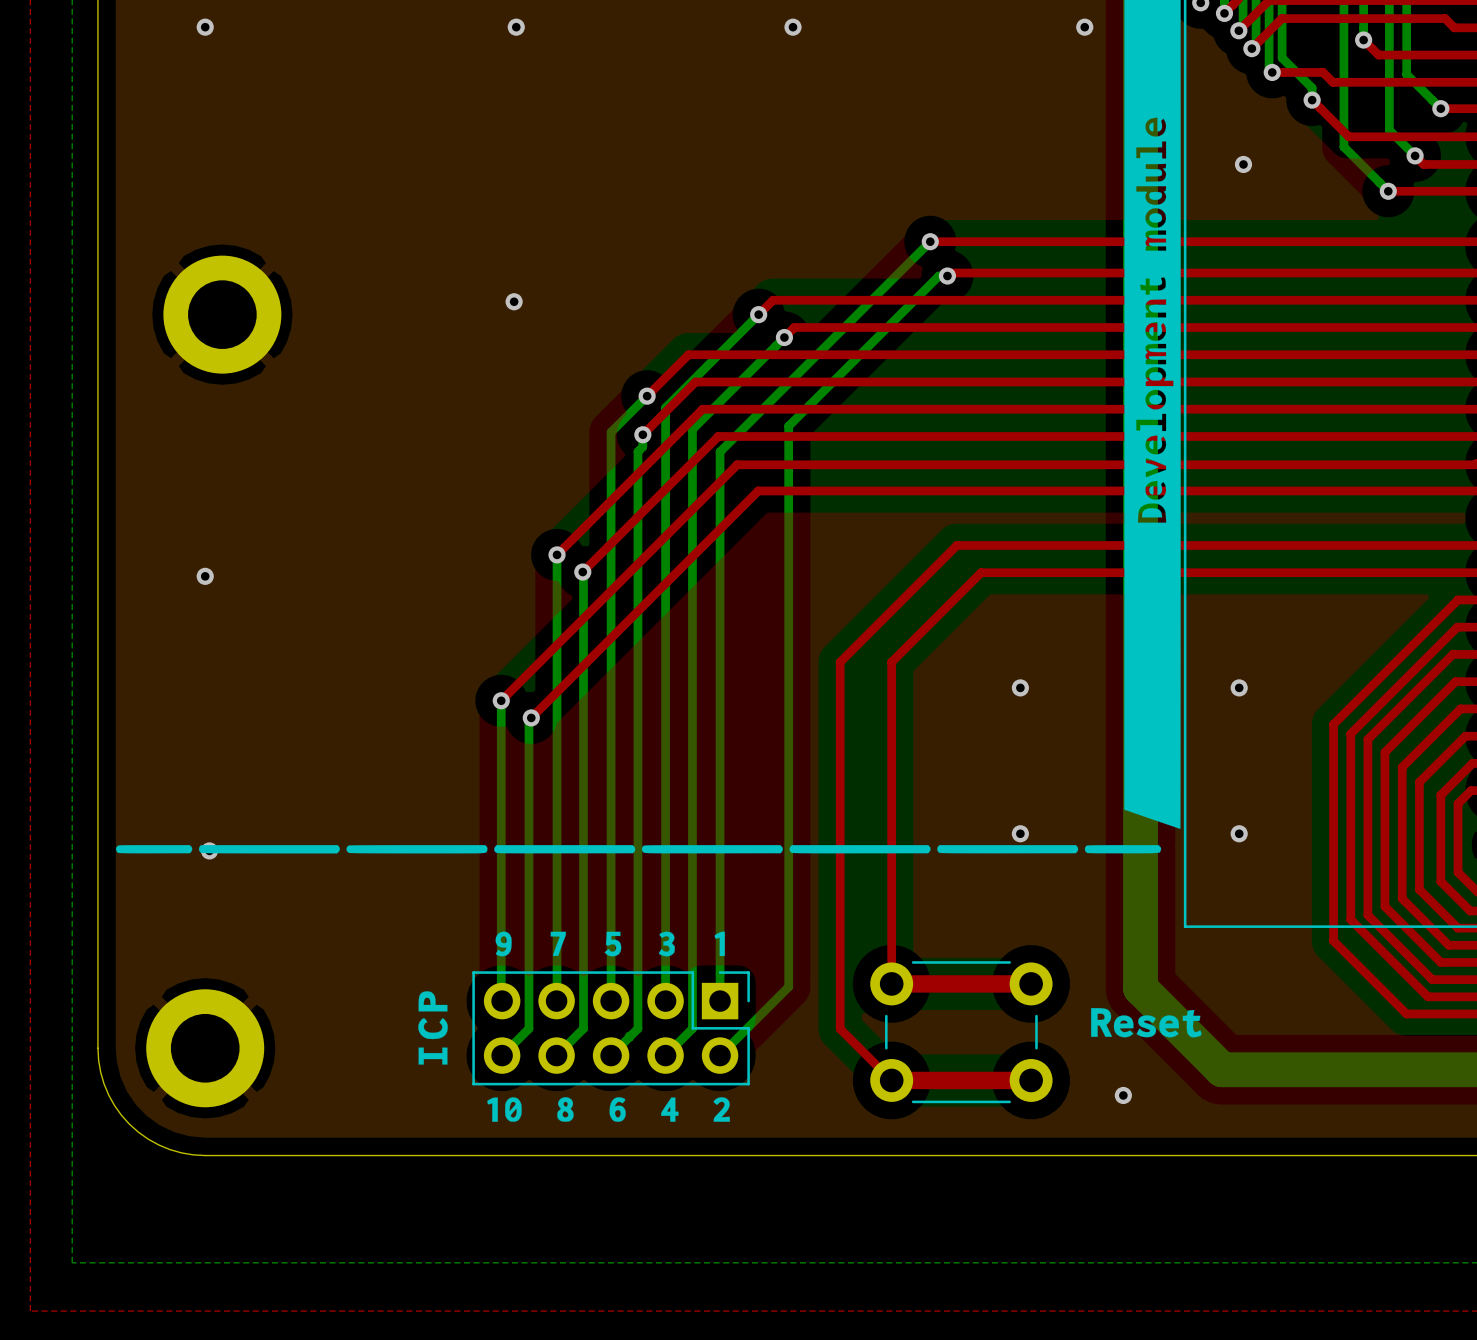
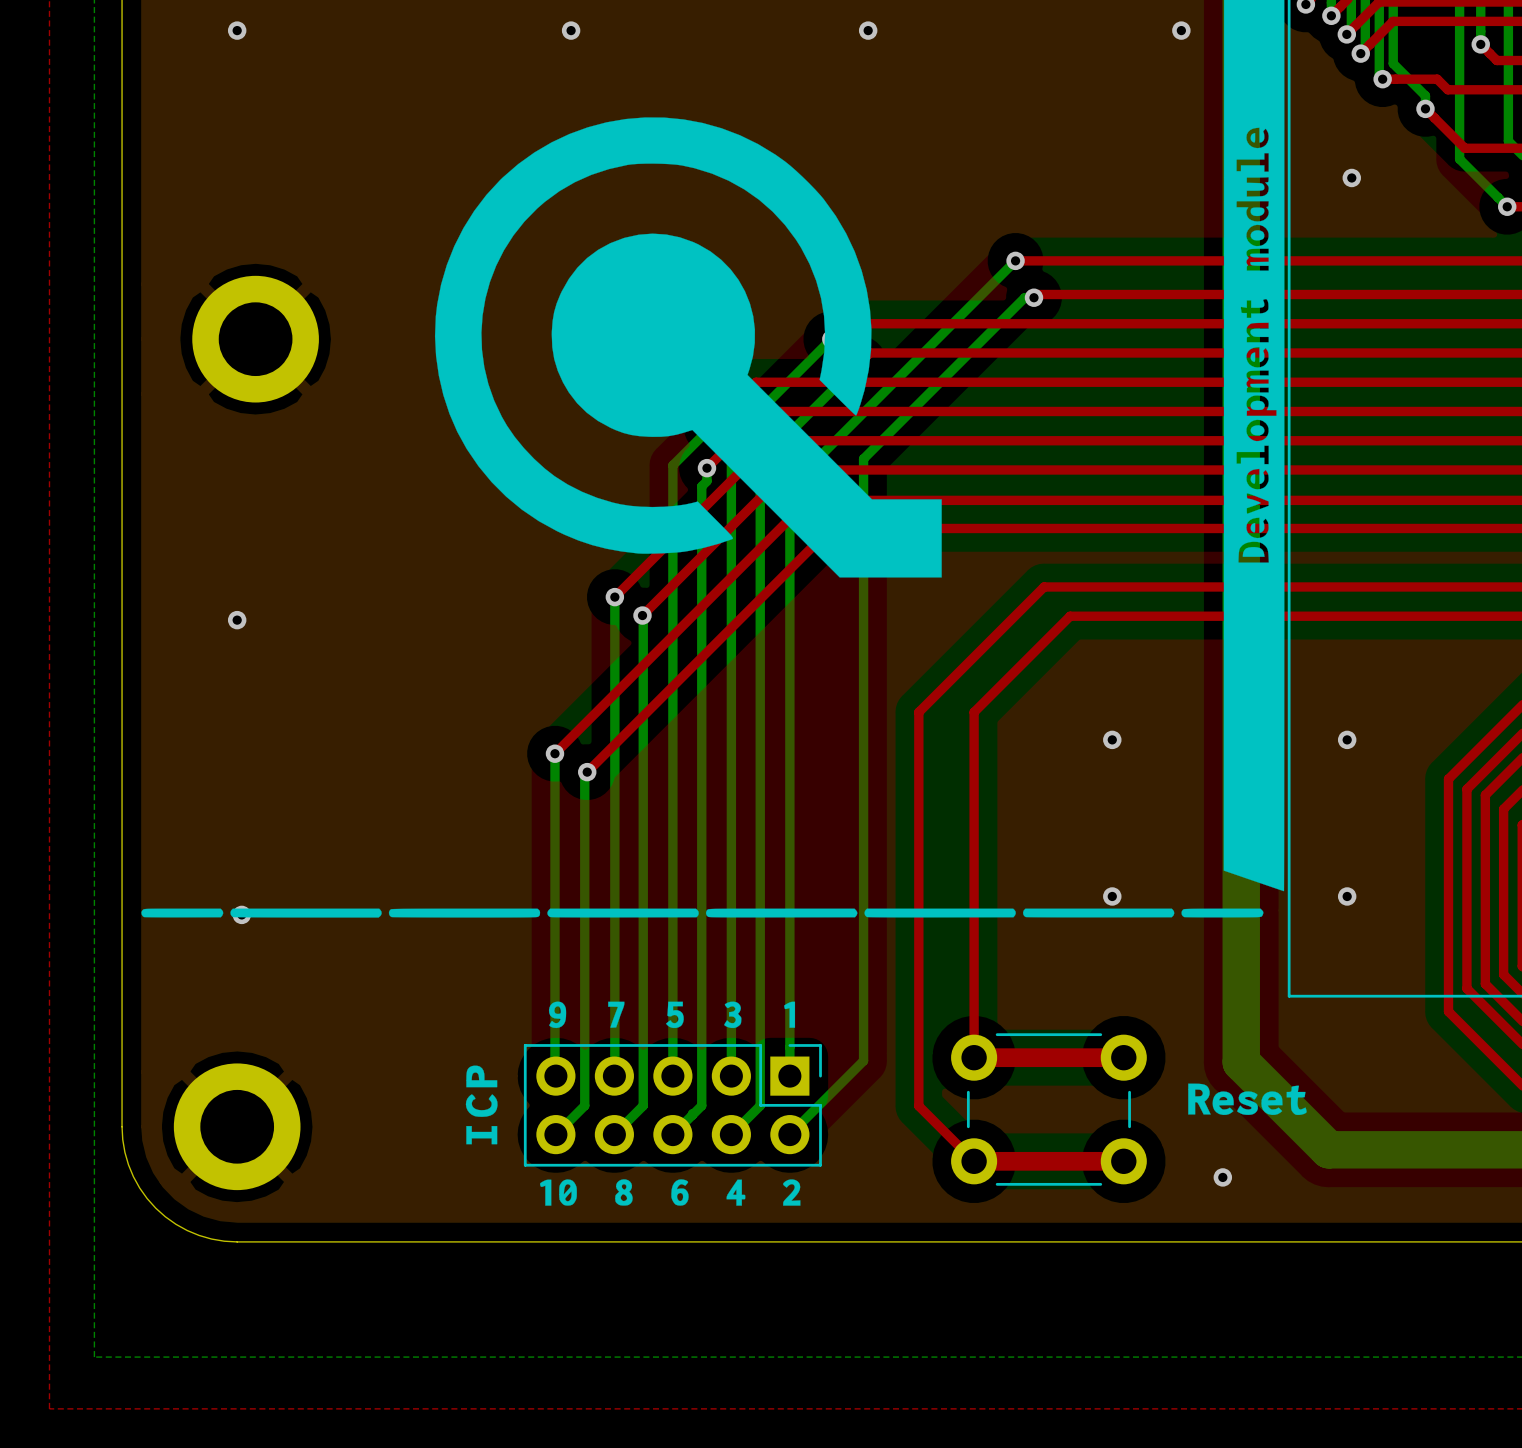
drawing: none -> [434, 117, 942, 578]

